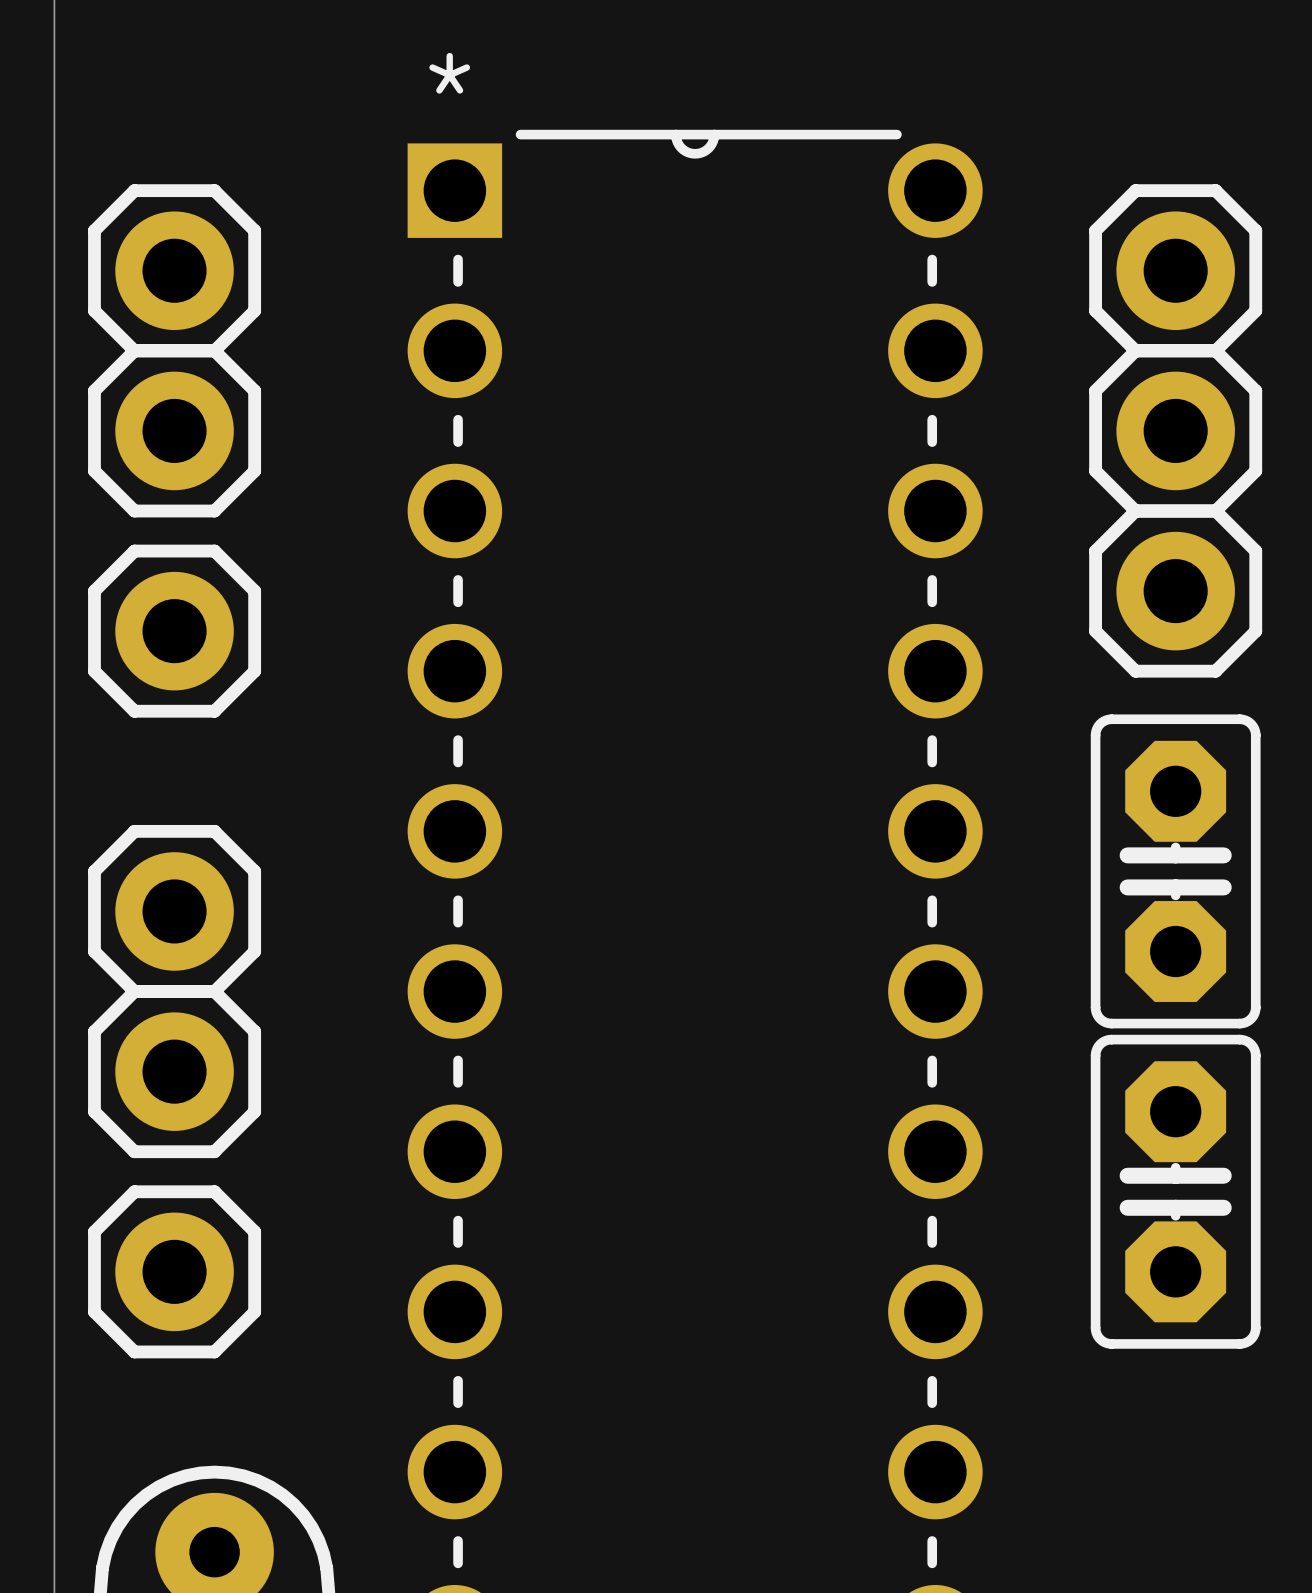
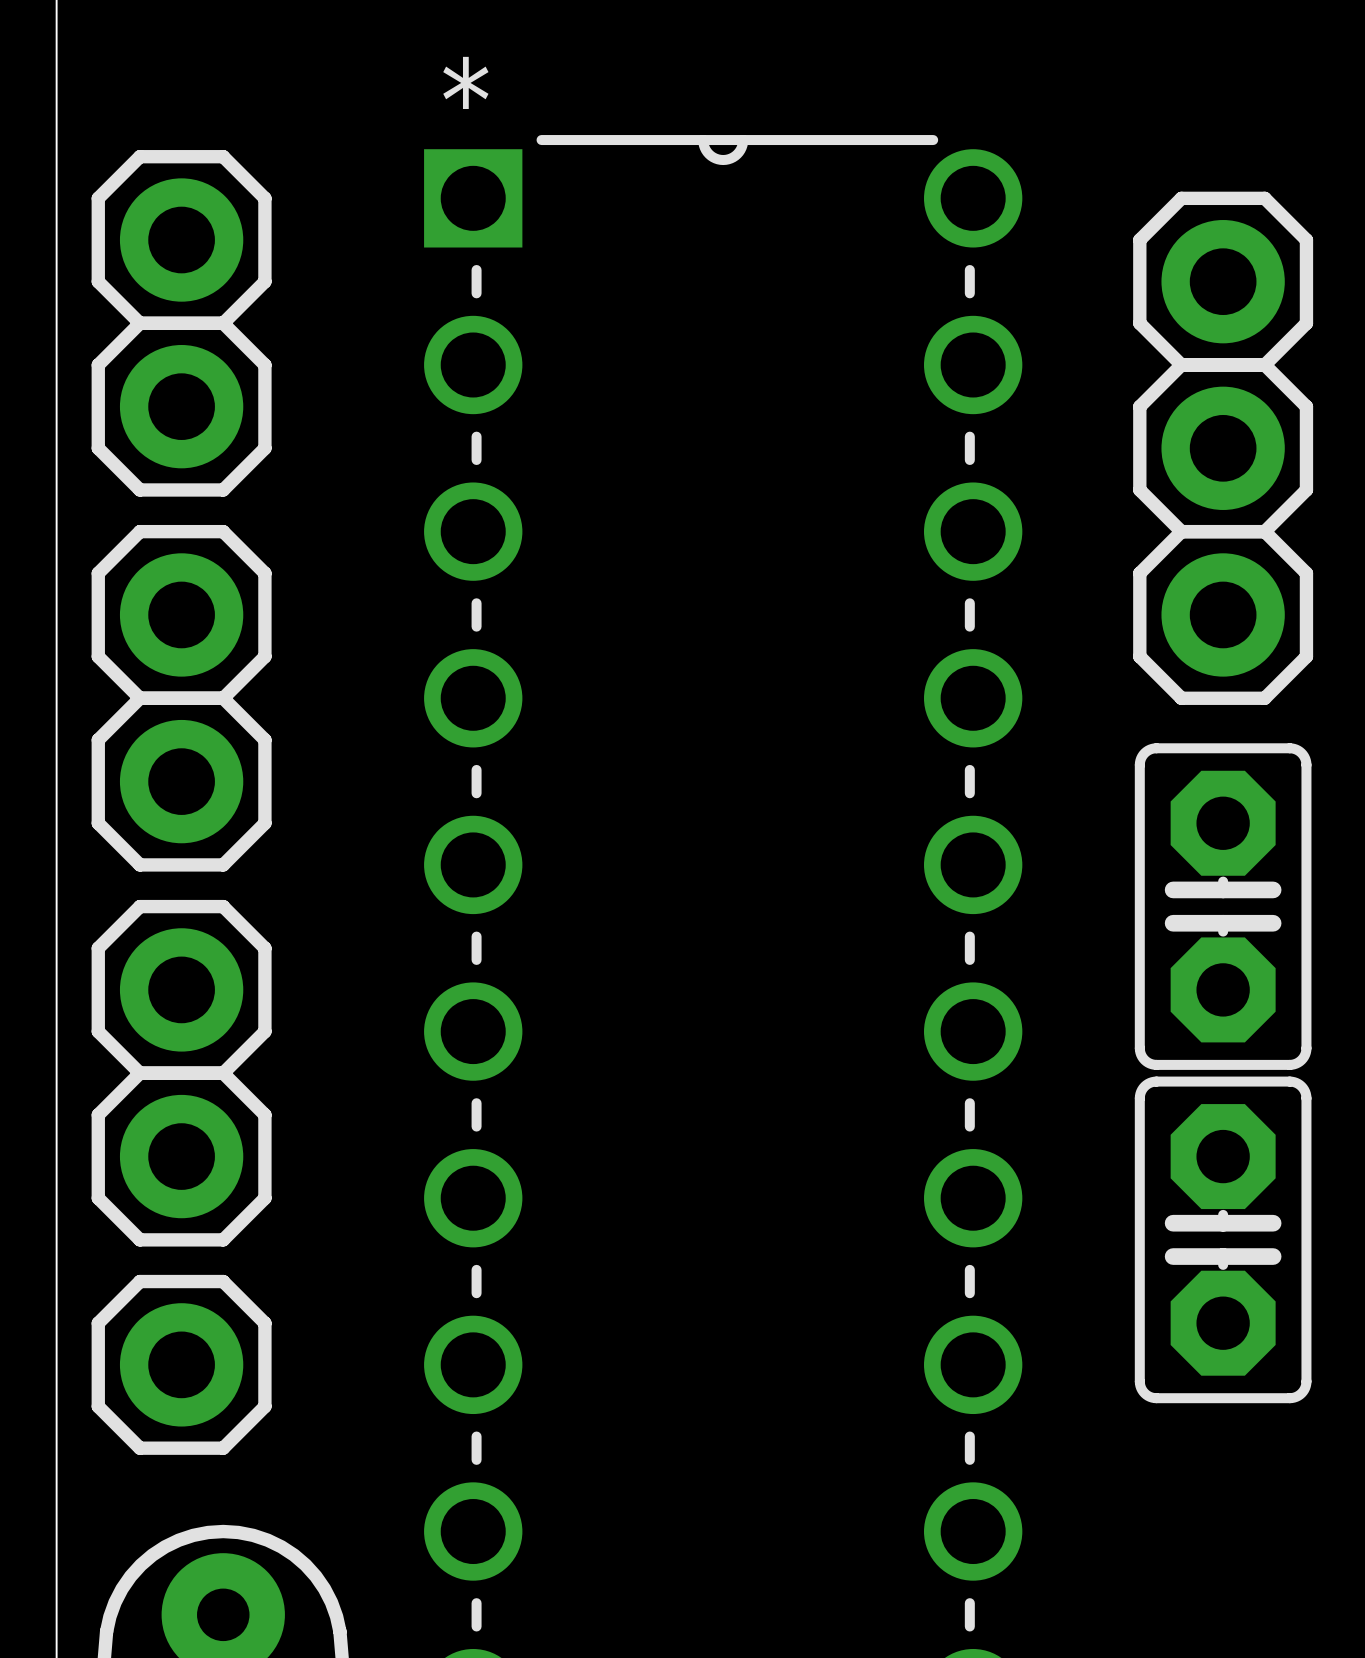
part position: (174, 270) -> (181, 240)
part position: (174, 430) -> (181, 406)
part position: (174, 631) -> (181, 614)
part: none -> (181, 781)
part position: (174, 911) -> (181, 989)
part position: (174, 1071) -> (181, 1156)
part position: (174, 1271) -> (181, 1364)

